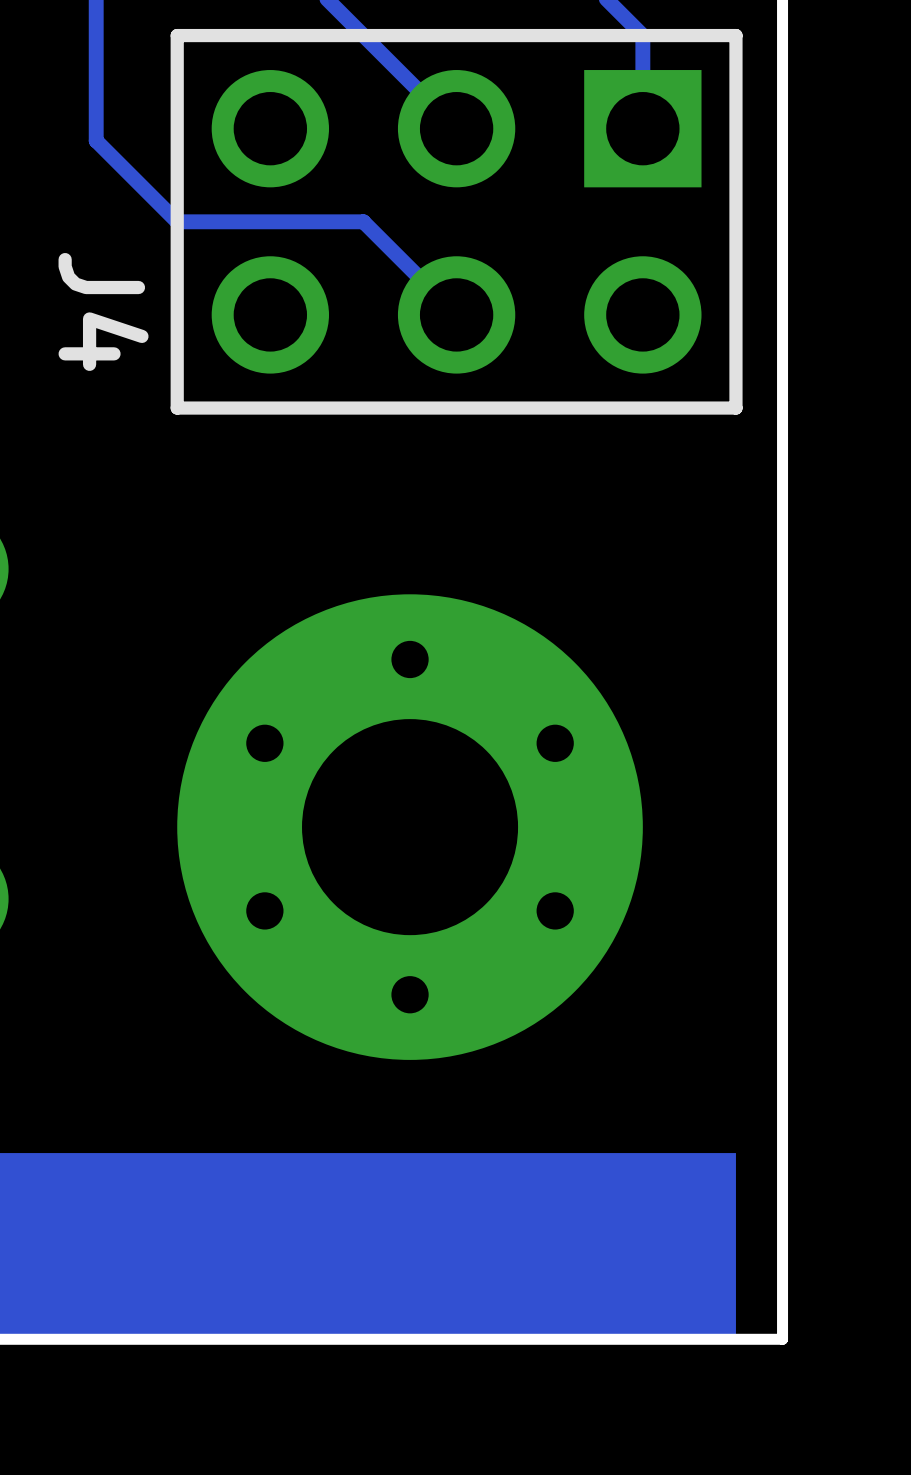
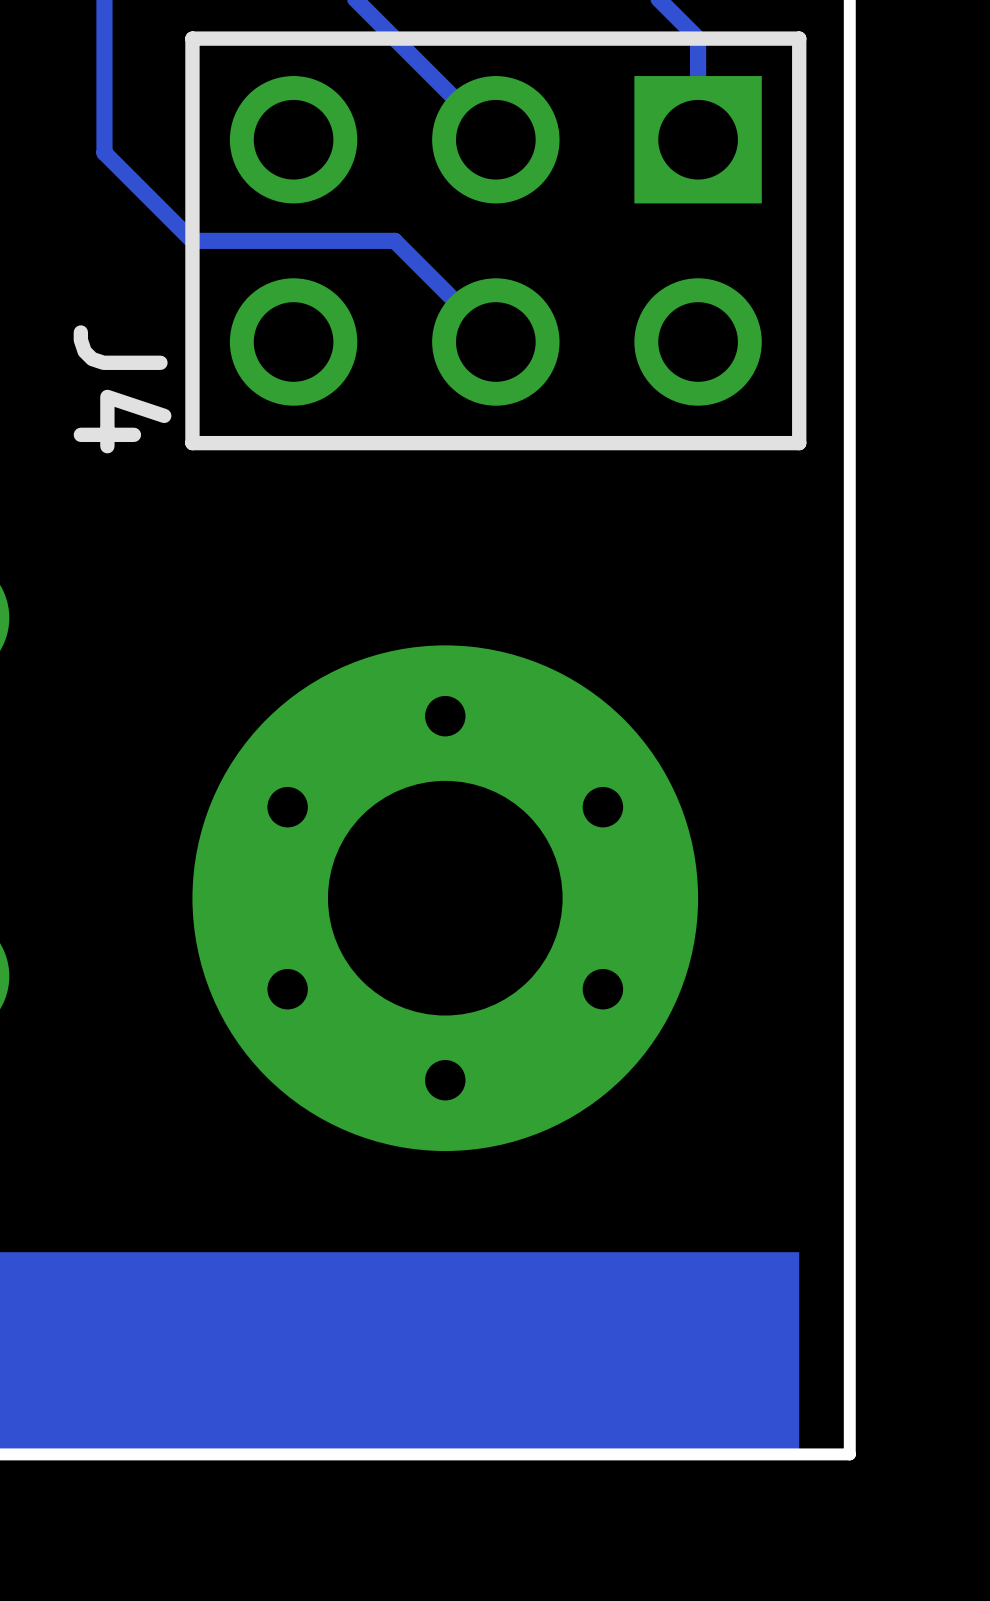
J4 name position: J4 (103, 311) -> J4 (122, 389)

